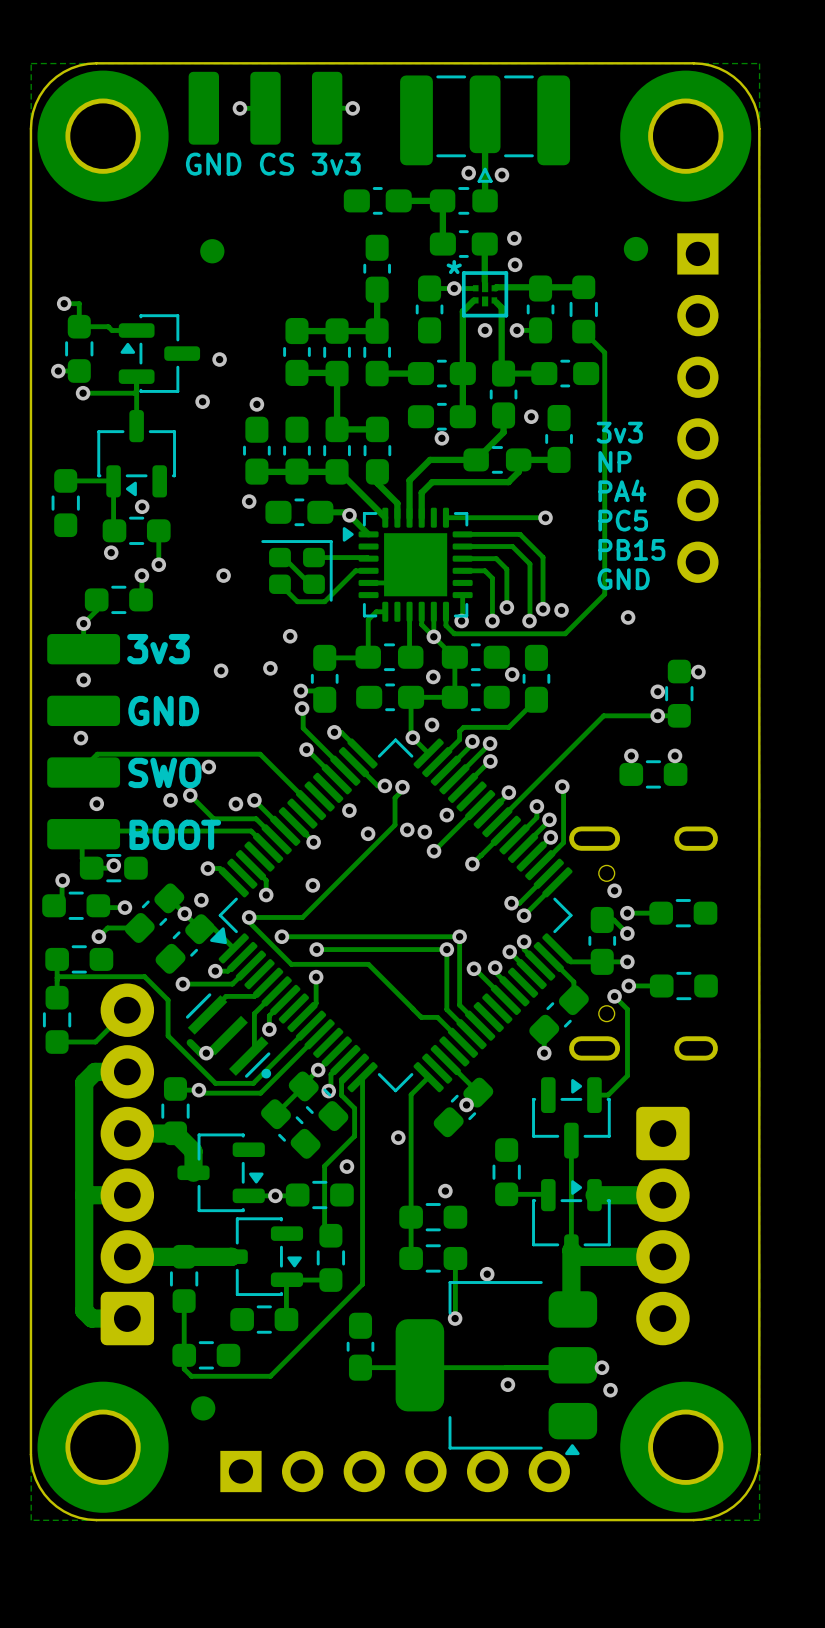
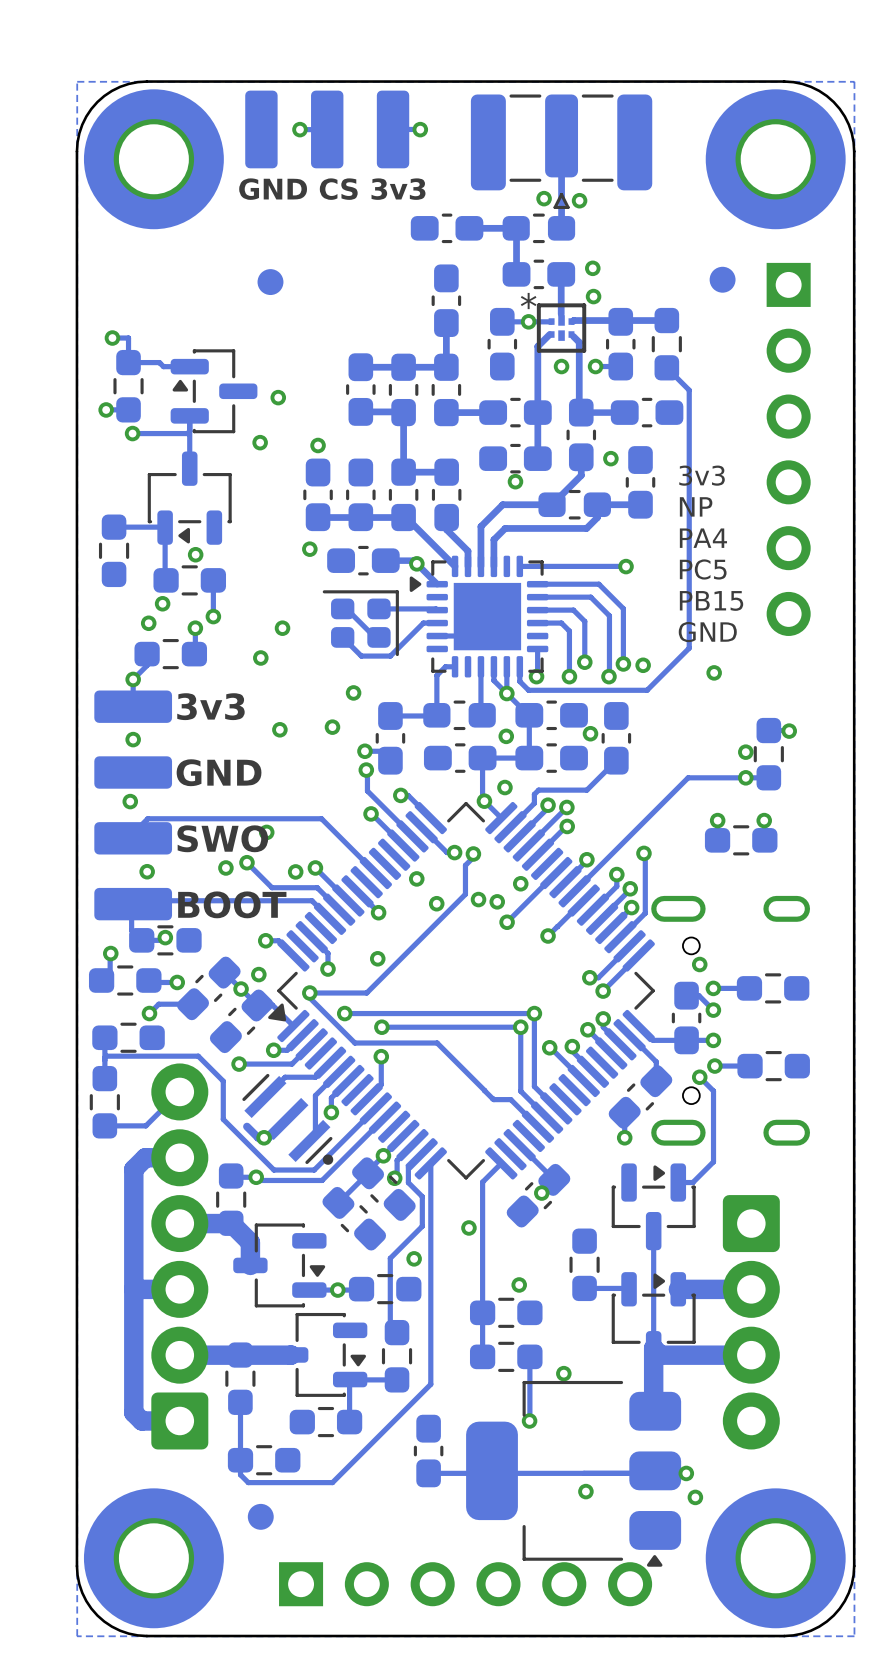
via: none -> (148, 623)
via: none -> (260, 657)

